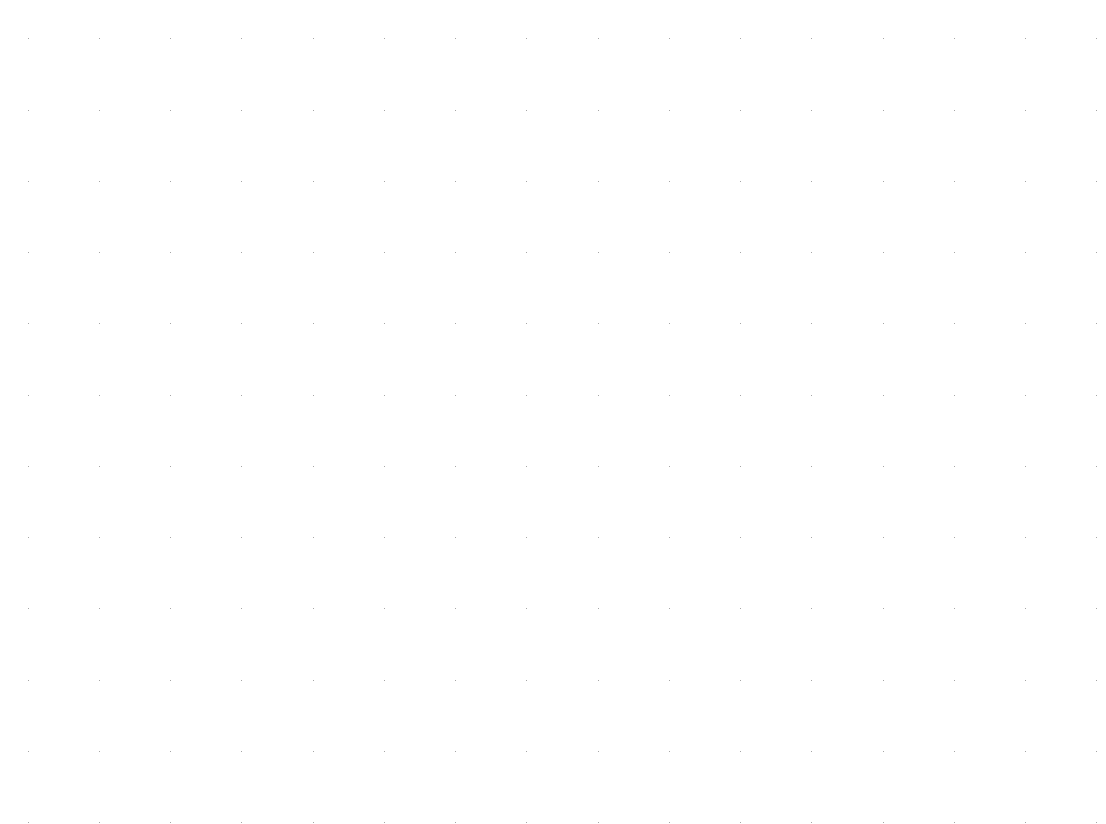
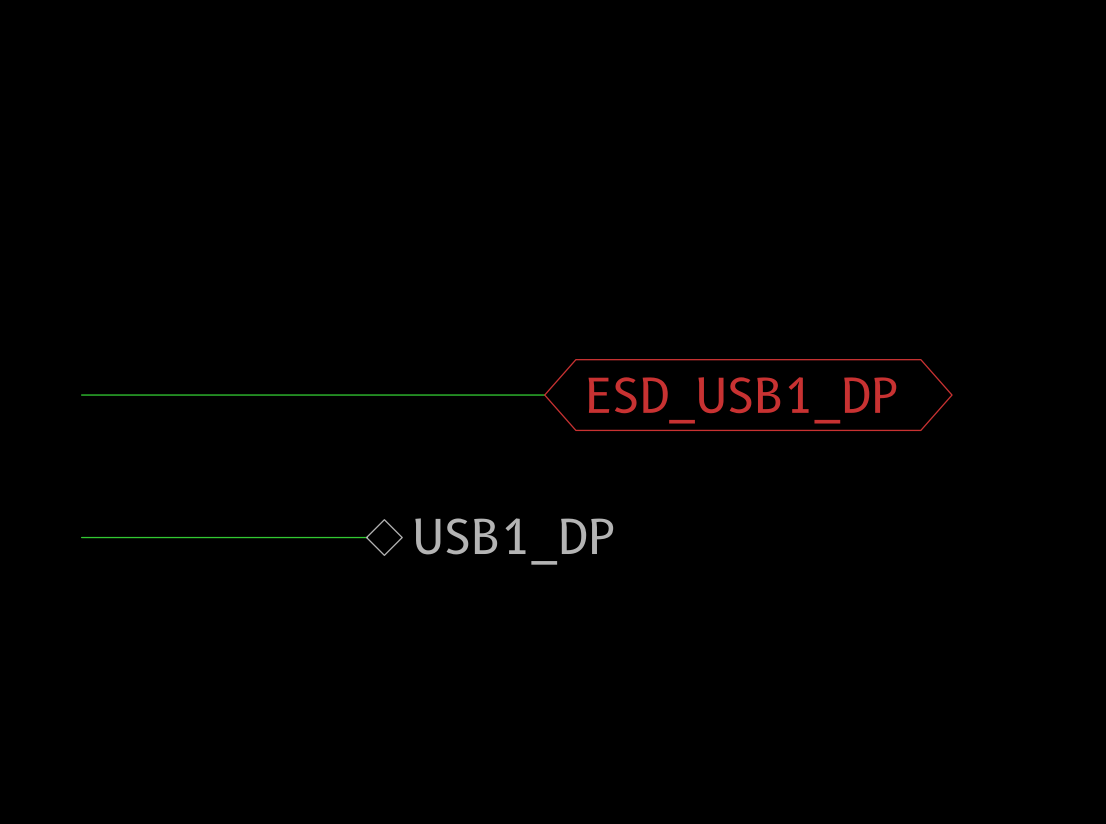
wire: none -> (81, 395) (544, 395)
global label: none -> ESD_USB1_DP (742, 400)
wire: none -> (81, 537) (366, 537)
hierarchical label: none -> USB1_DP (514, 541)

